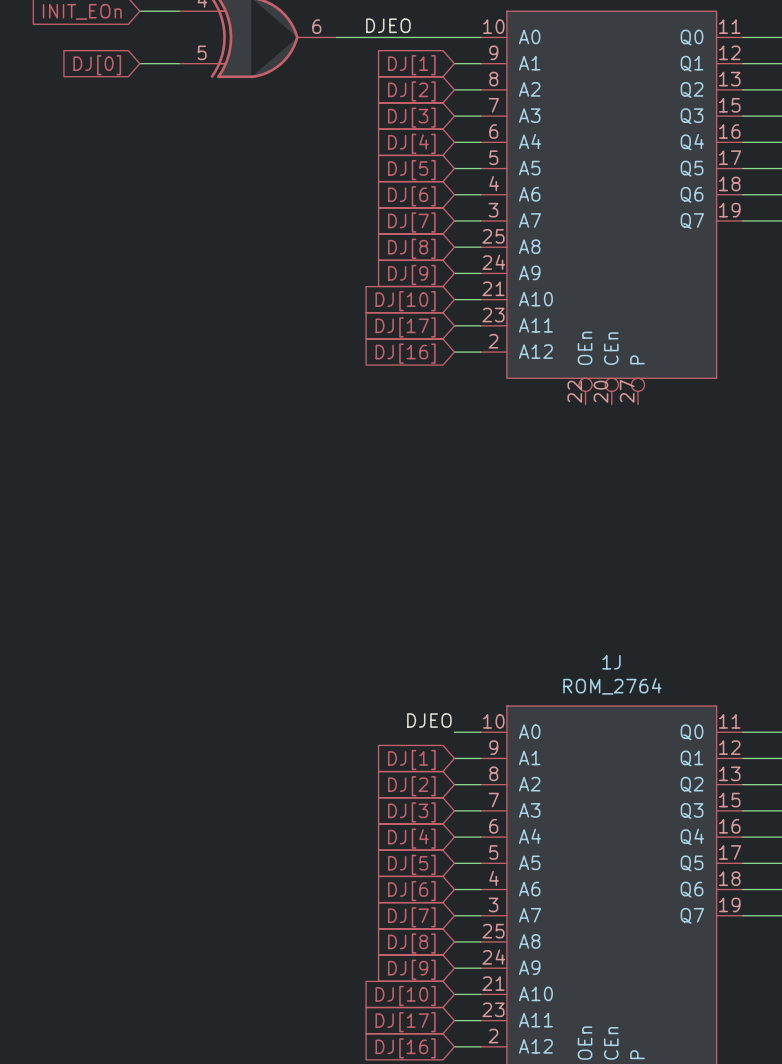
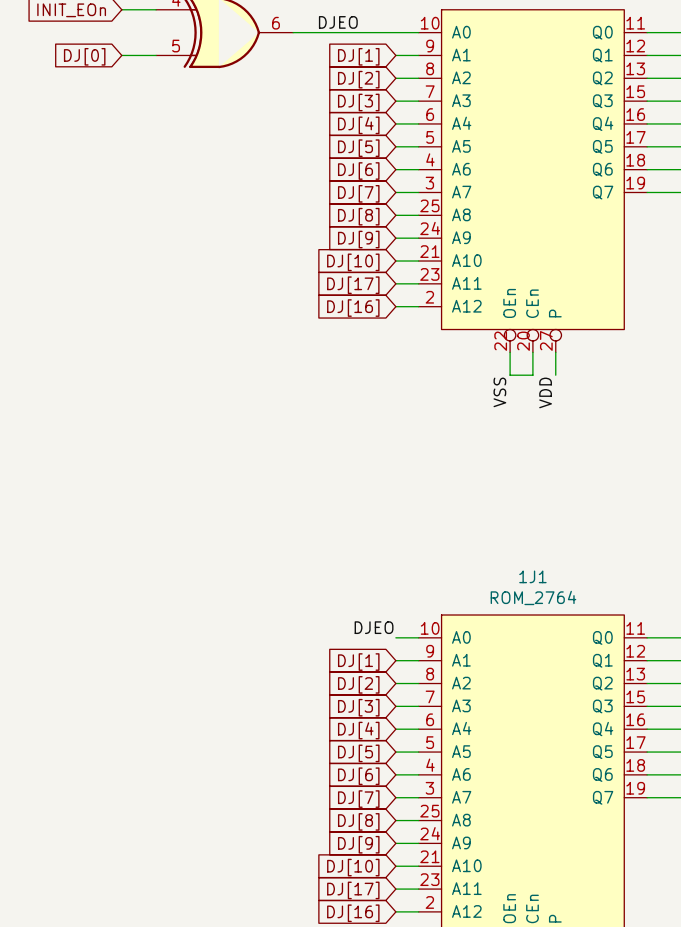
wire: none -> (510, 352) (510, 375) (532, 375) (532, 352)
wire: none -> (555, 352) (555, 375)
label: none -> VSS (499, 392)
label: none -> VDD (545, 392)
1J name: 1J (611, 662) -> 1J1 (532, 576)

